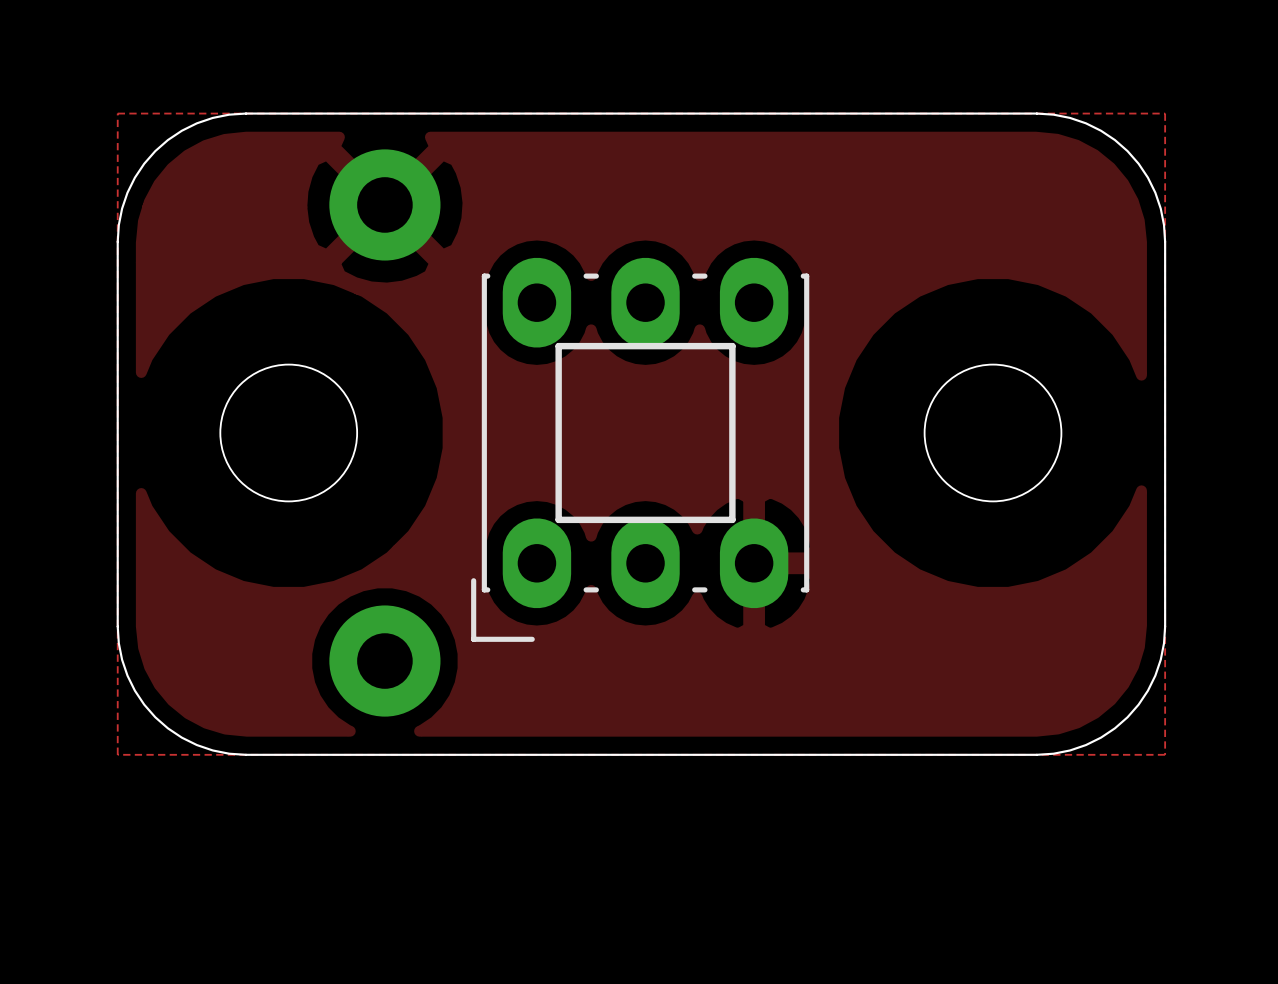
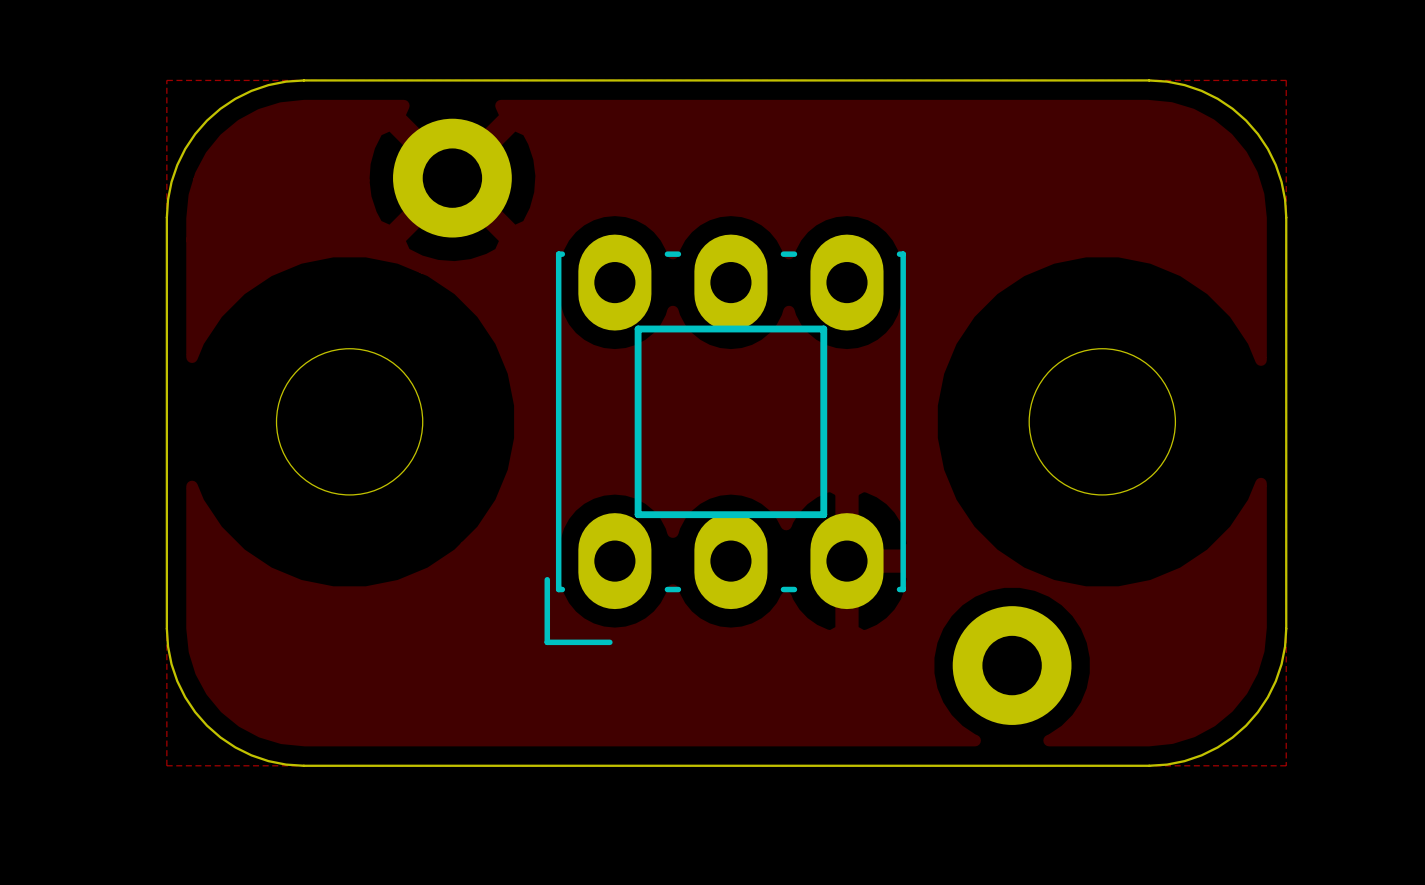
part position: (384, 661) -> (1012, 665)

